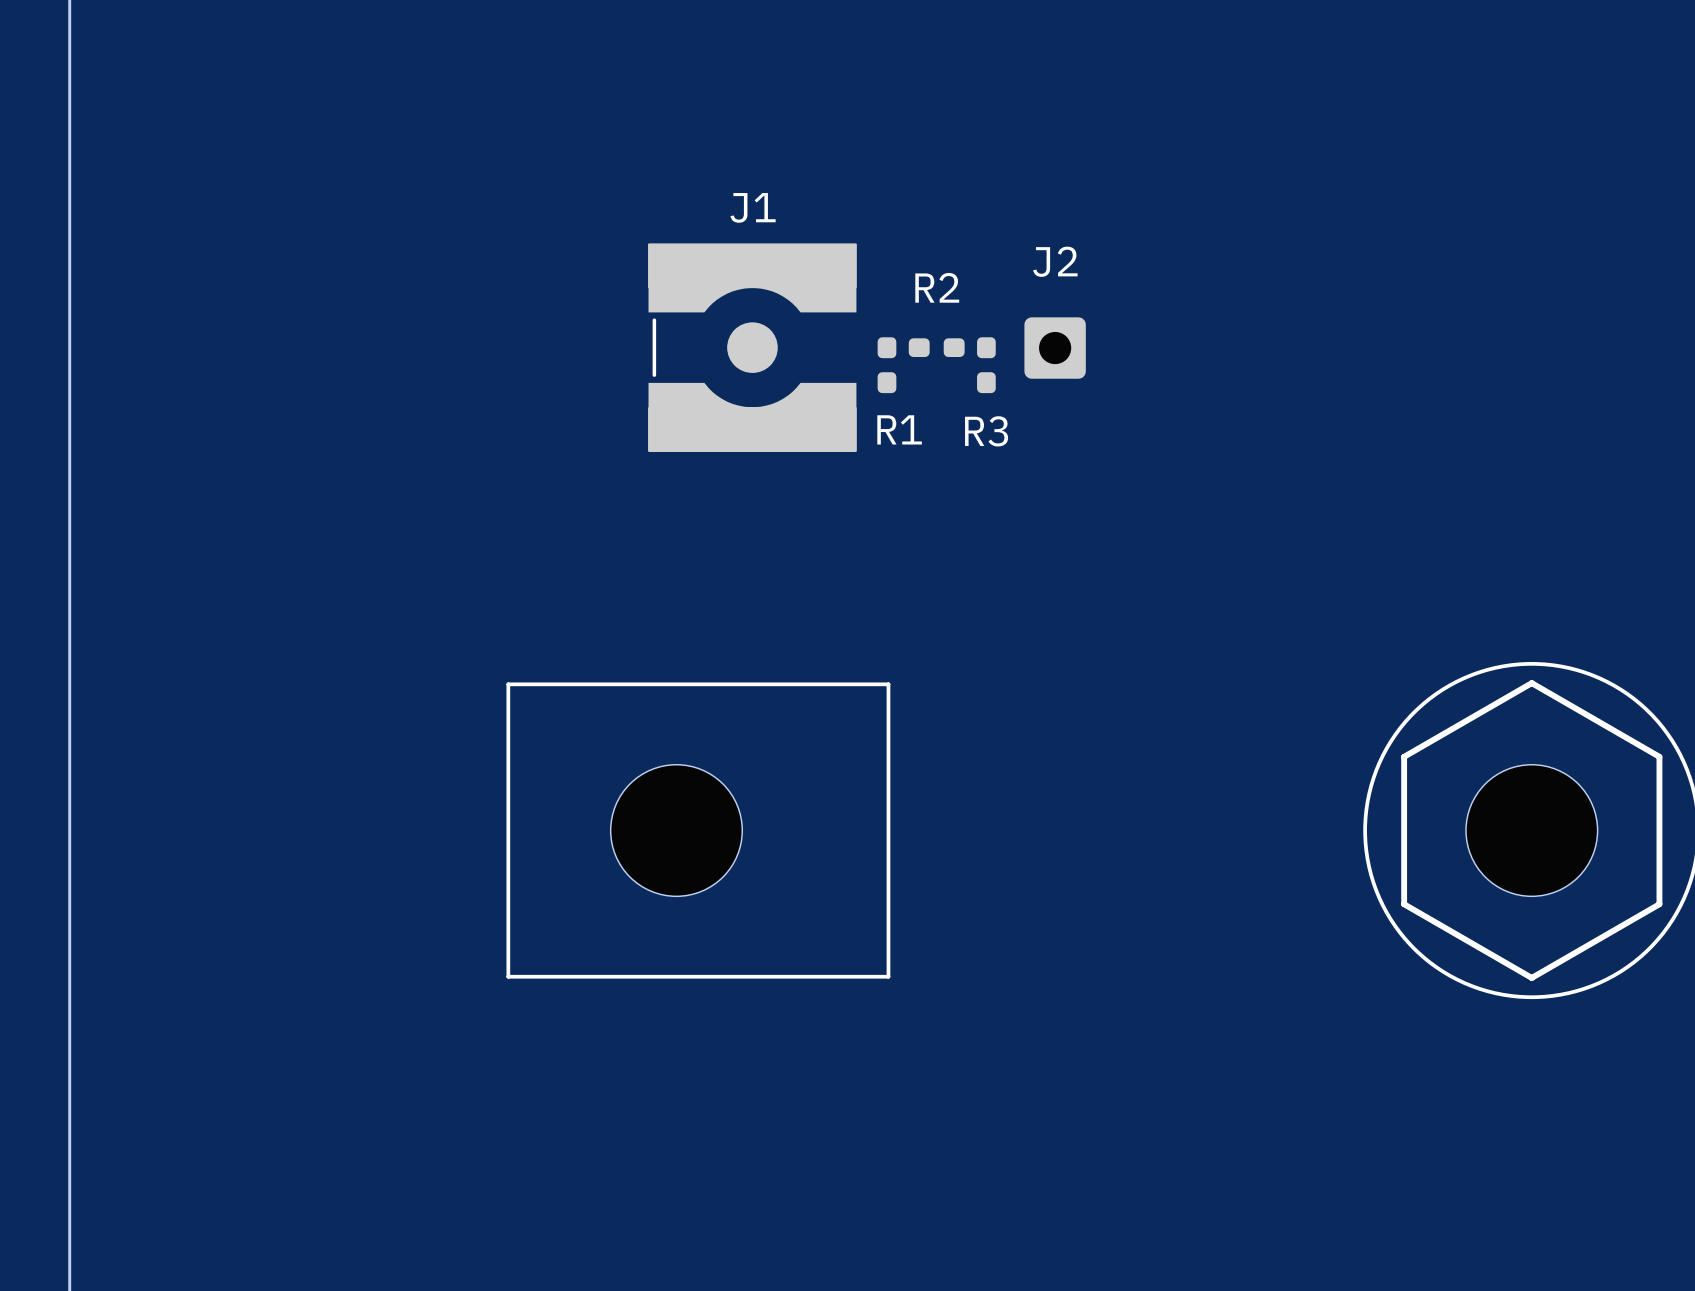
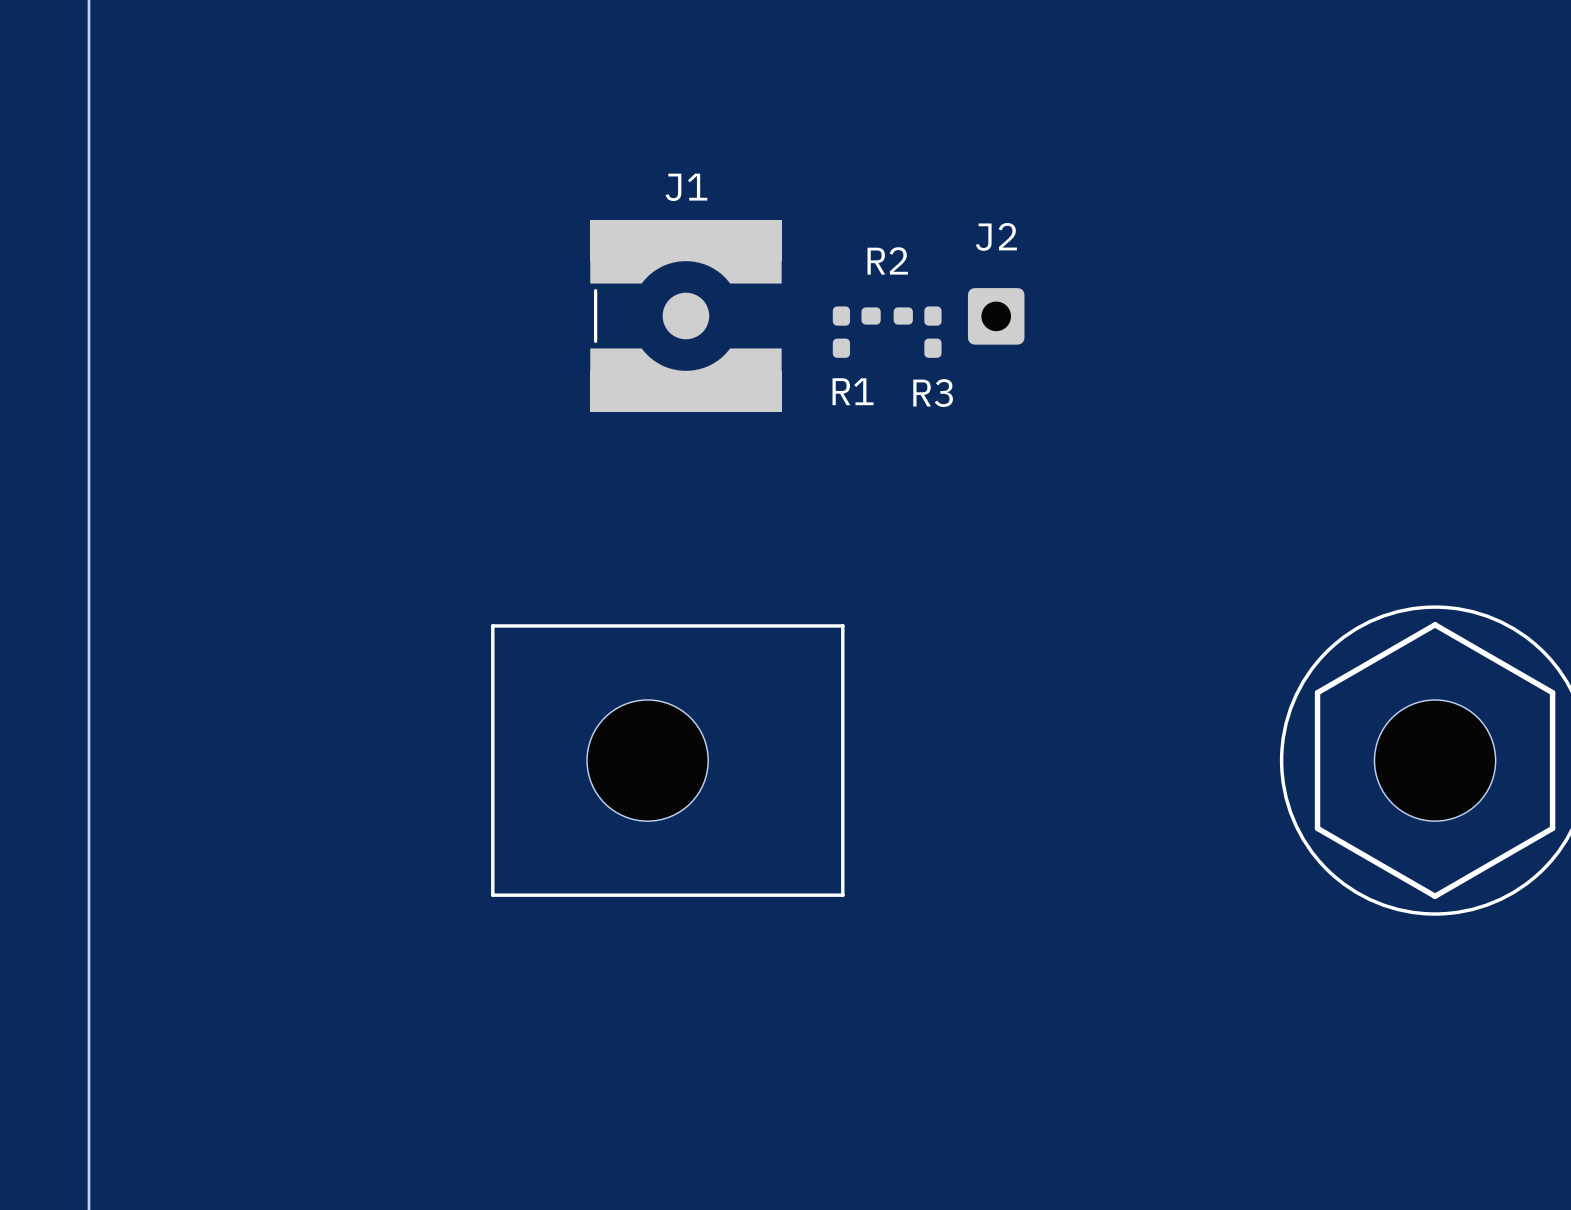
J1 position: (752, 347) -> (685, 315)

